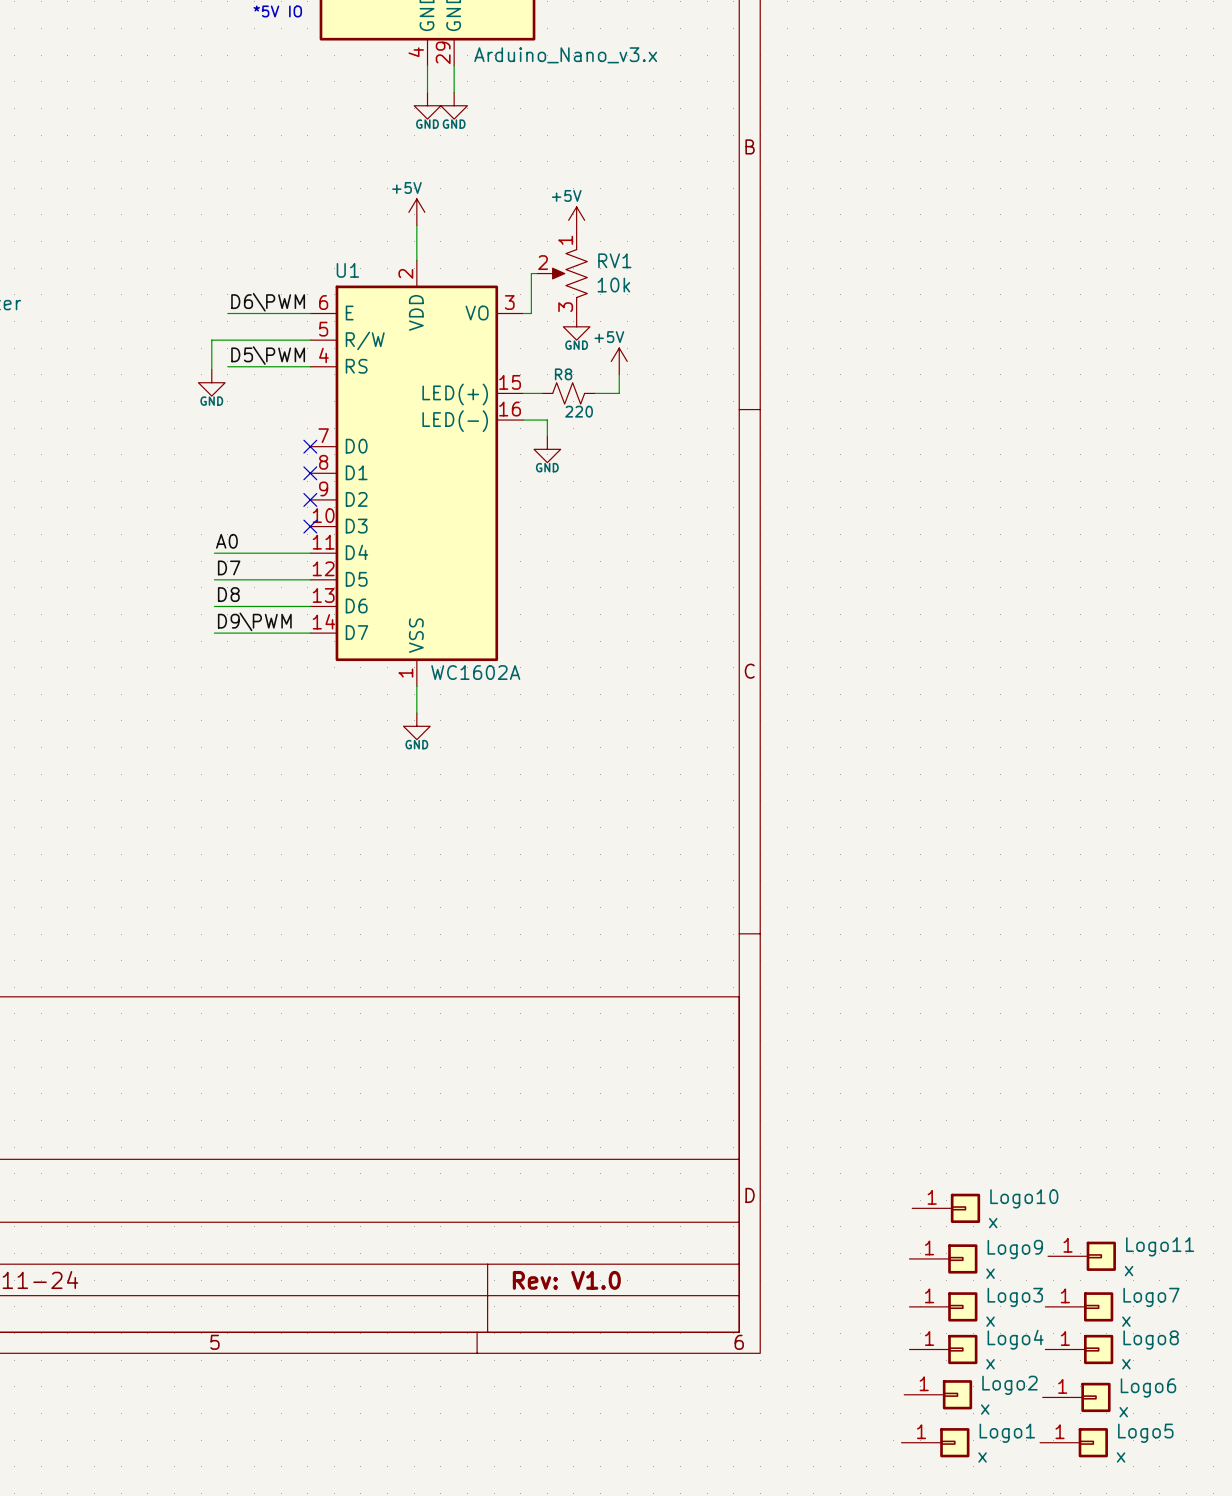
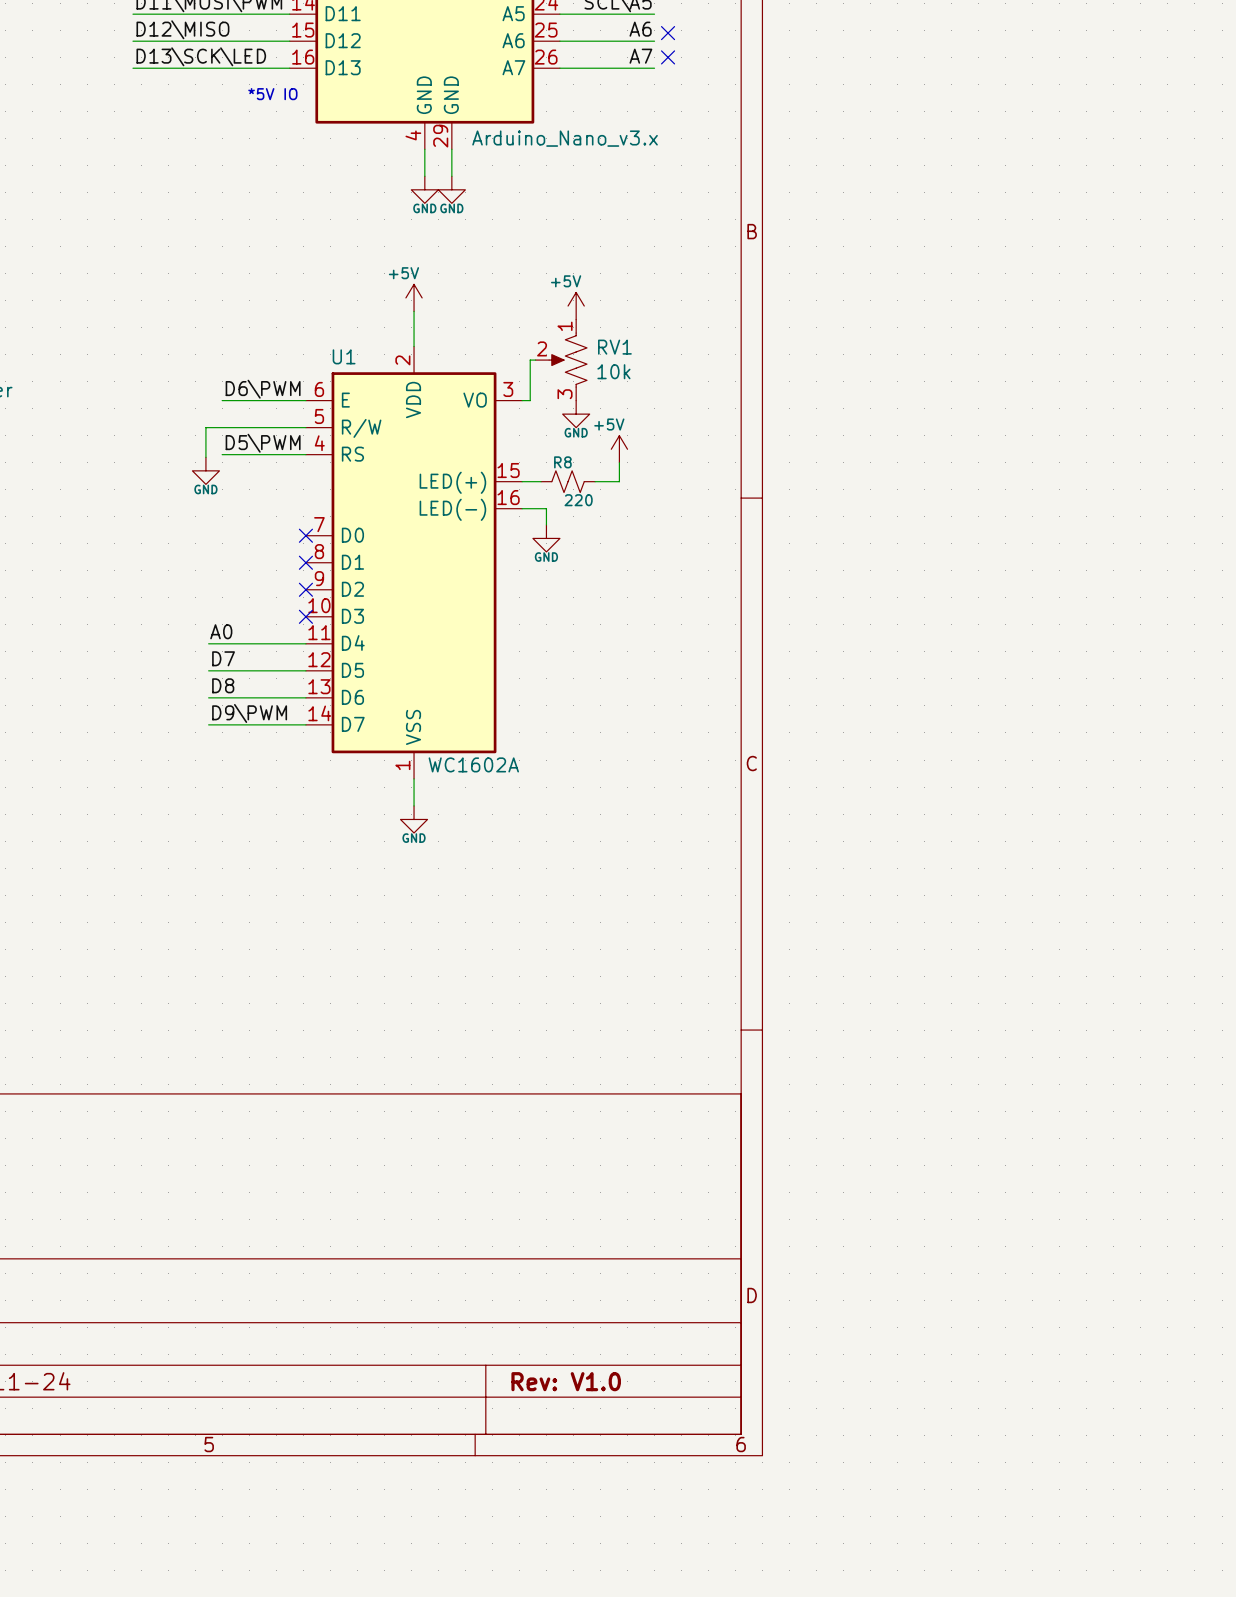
Logo10: x (946, 1208) -> none
Logo11: x (1081, 1256) -> none
Logo9: x (943, 1258) -> none
Logo3: x (943, 1306) -> none
Logo7: x (1079, 1306) -> none
Logo4: x (943, 1349) -> none
Logo8: x (1079, 1349) -> none
Logo2: x (938, 1394) -> none
Logo6: x (1076, 1397) -> none
Logo1: x (935, 1442) -> none
Logo5: x (1074, 1442) -> none

